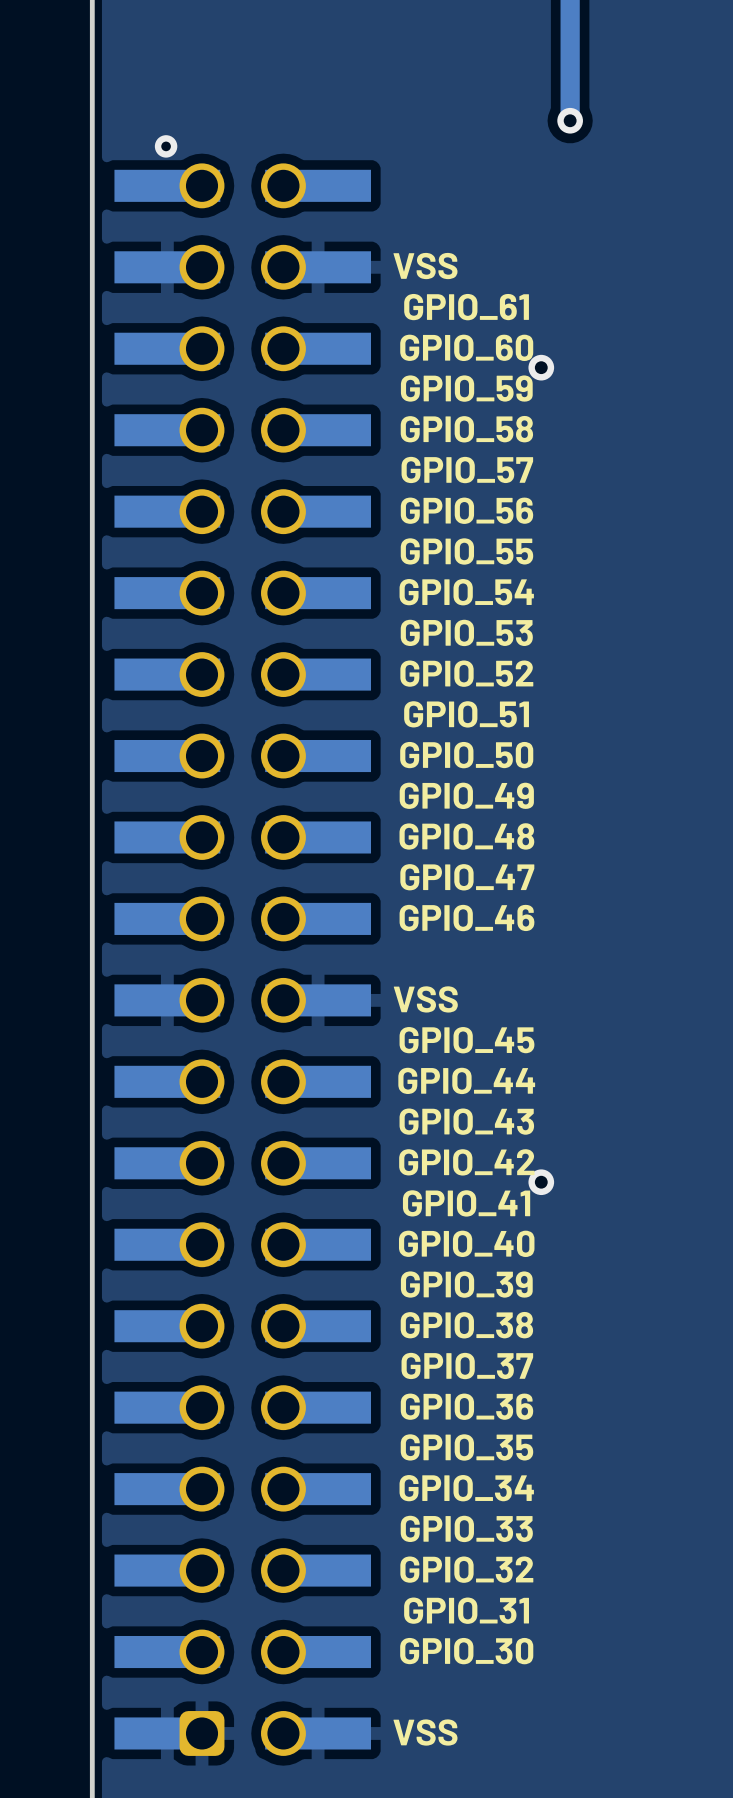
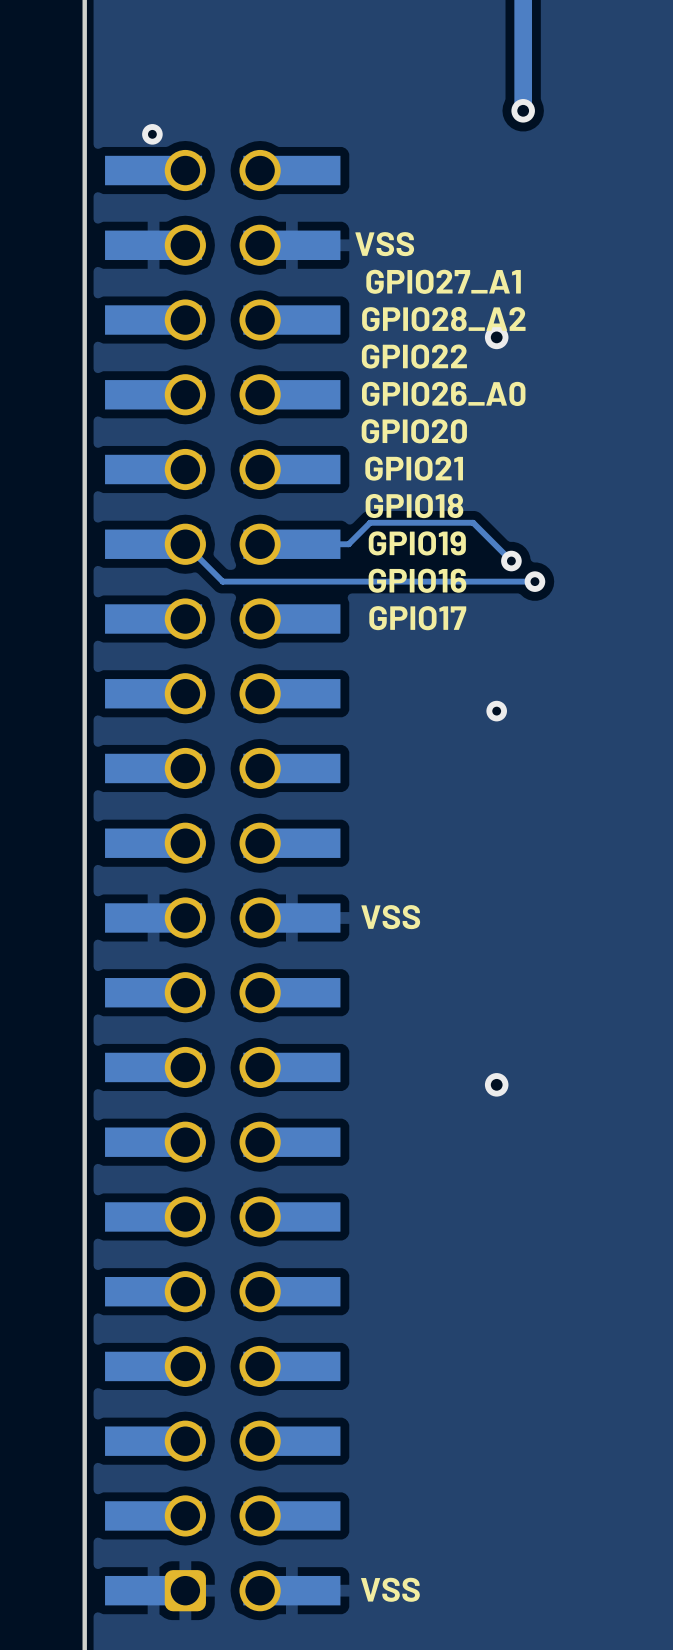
part footprint: [114, 163, 372, 1756] -> [105, 149, 341, 1612]
track: none -> (185, 544) (222, 581) (534, 581)
track: none -> (260, 544) (348, 544) (370, 522) (473, 522) (511, 561)
via: none -> (511, 561)
via: none -> (534, 581)
via: none -> (496, 711)

